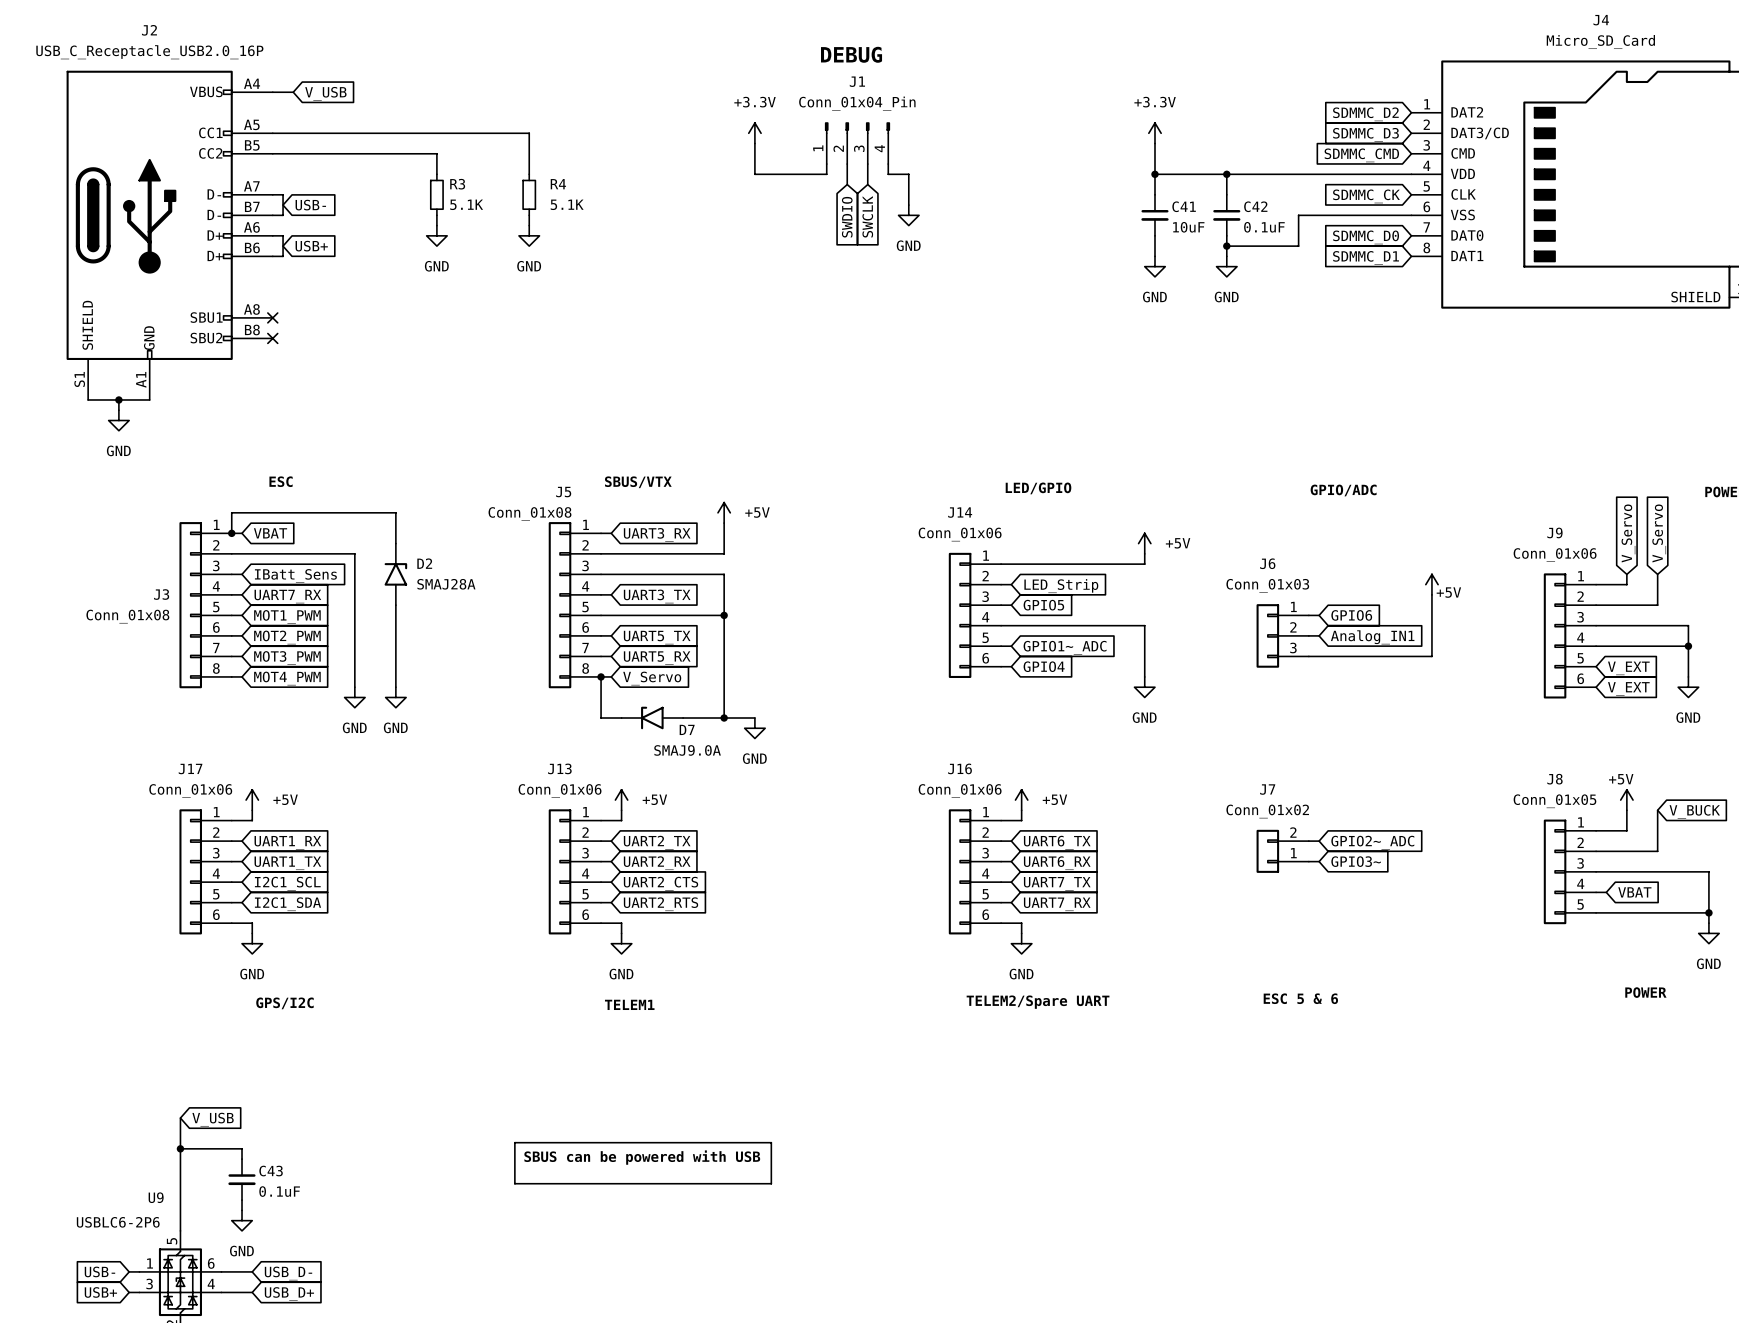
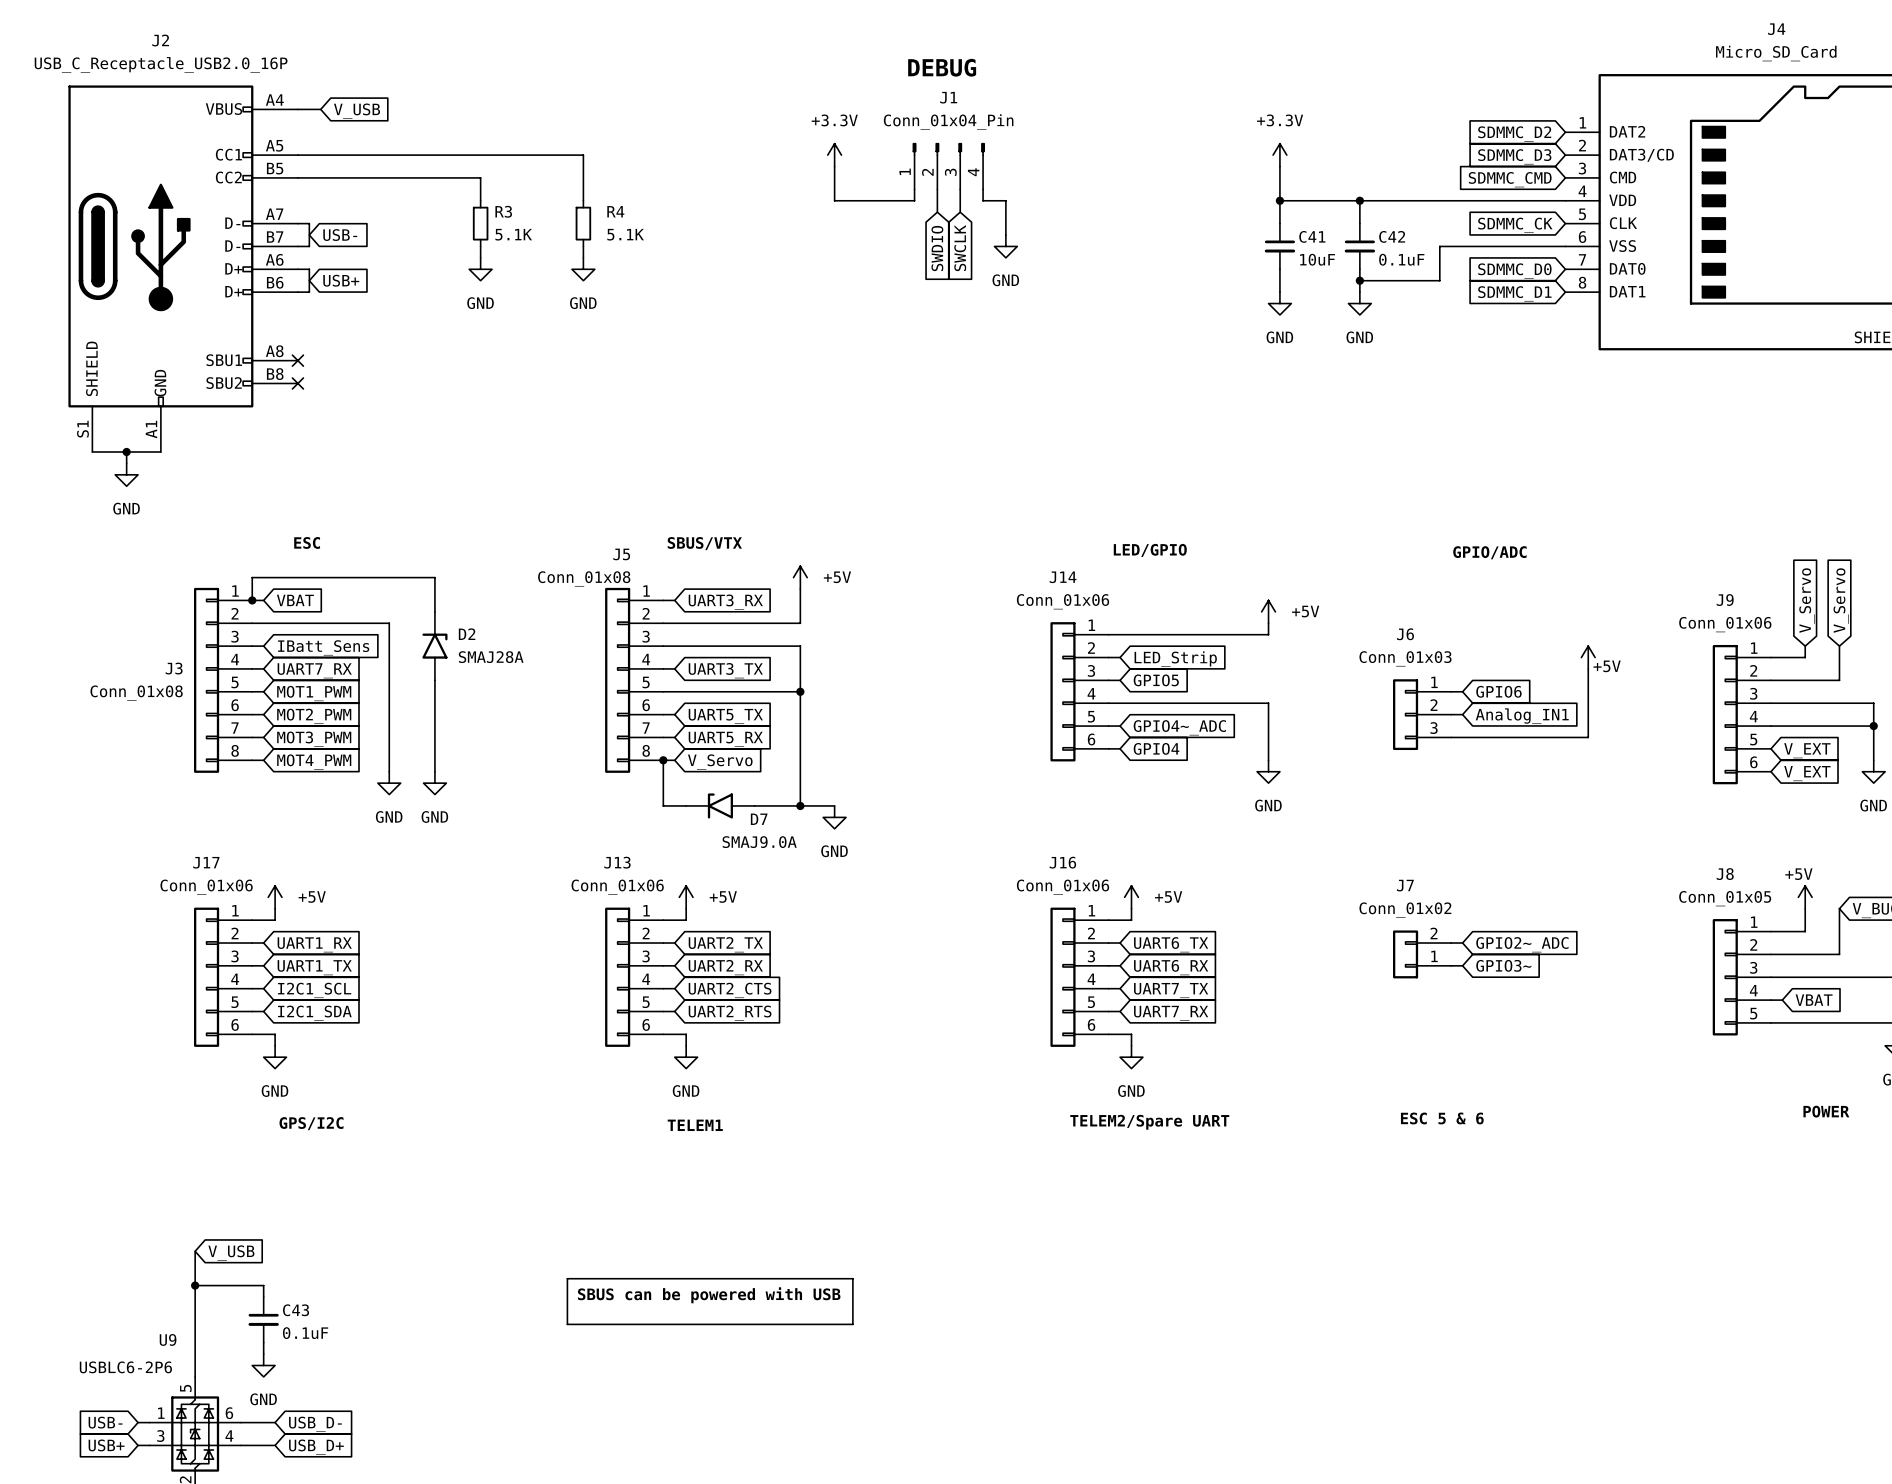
global label: GPIO1~_ADC (1065, 647) -> GPIO4~_ADC (1179, 727)

